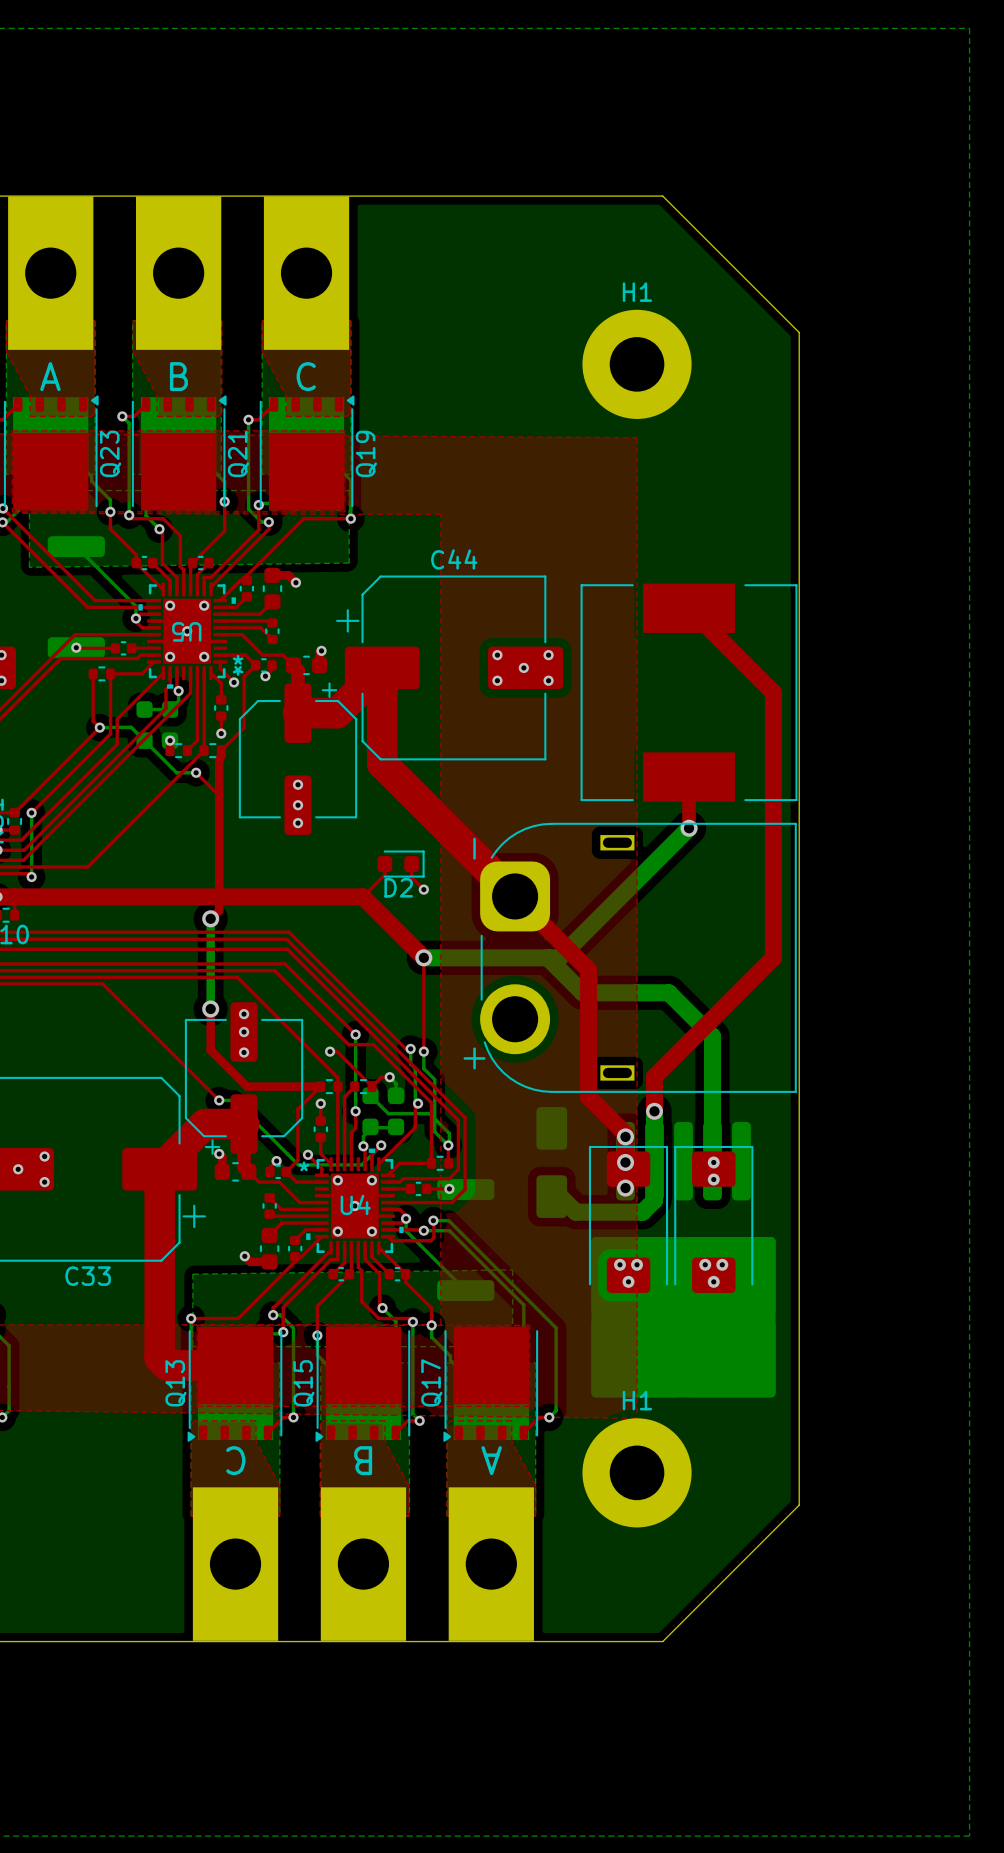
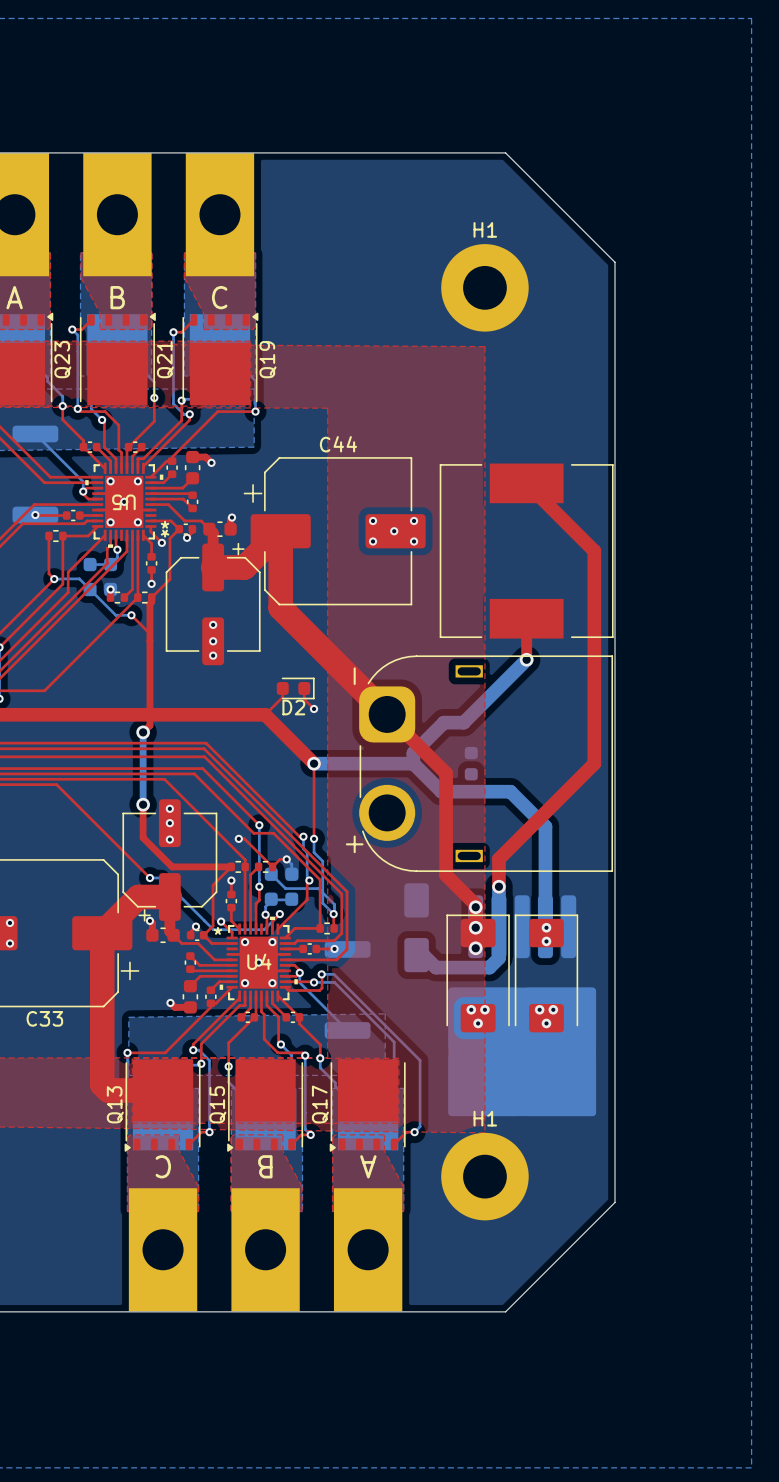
bottom track: (610, 906) (559, 957) (547, 957) -> (463, 722) (443, 722) (413, 753) (413, 763)
part: none -> (471, 763)

